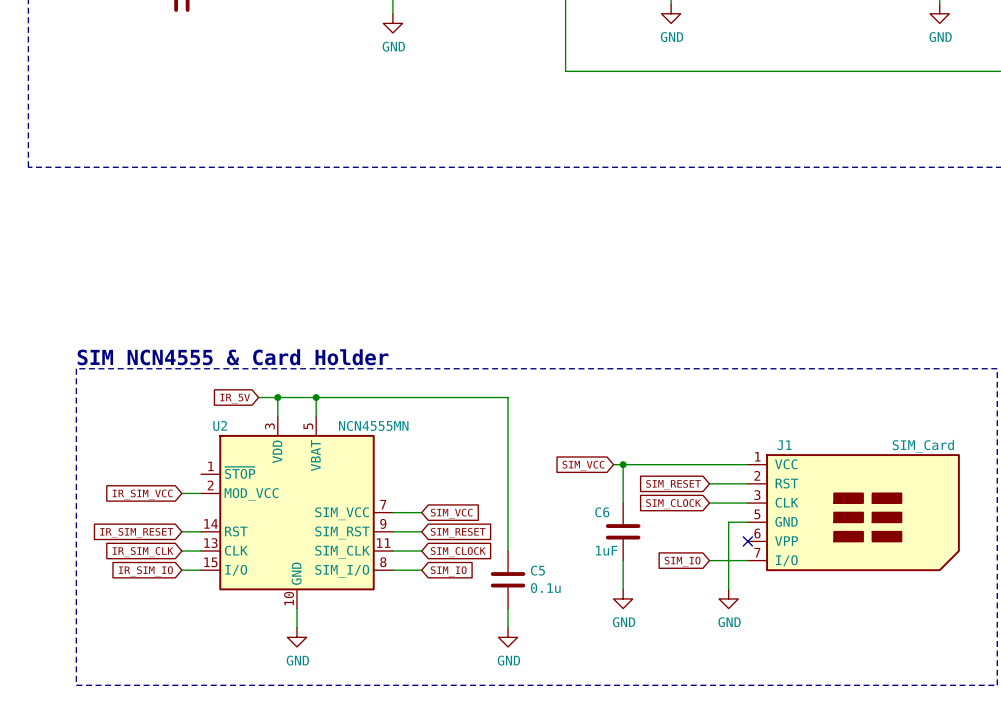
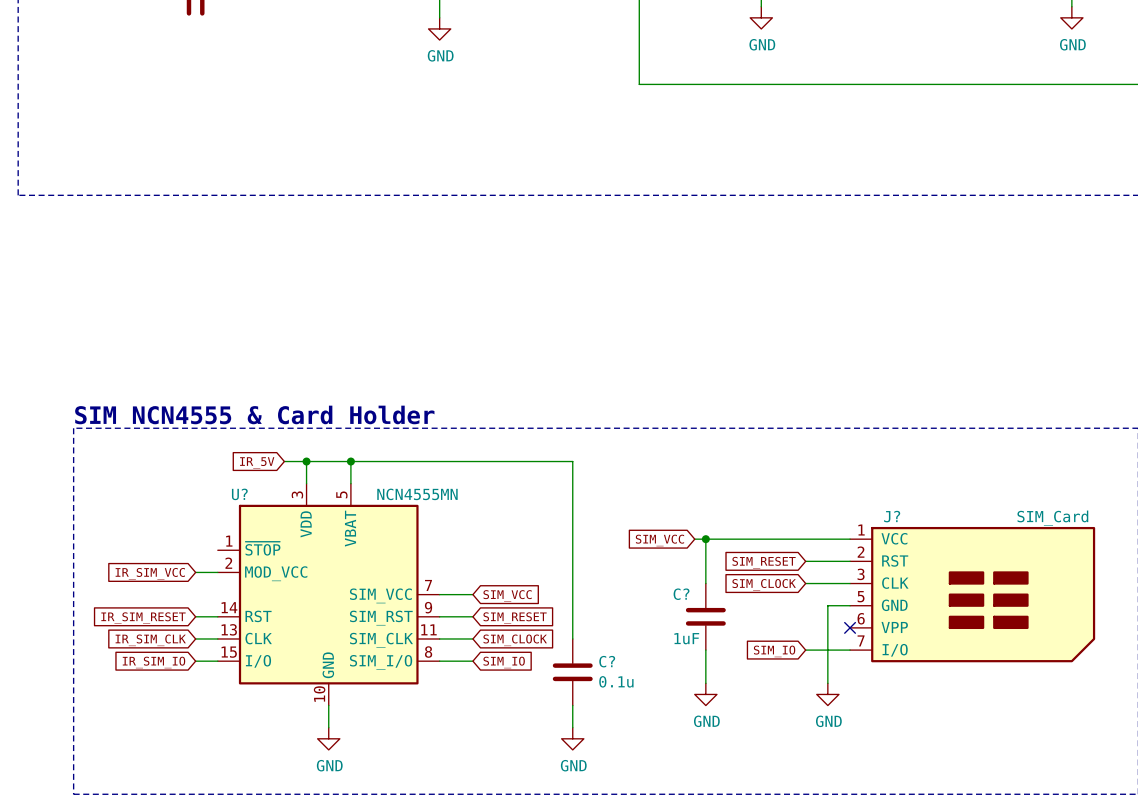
U2 name: U2 (220, 425) -> U? (239, 494)
J1 name: J1 (784, 445) -> J? (892, 516)
C6 name: C6 (602, 512) -> C? (681, 594)
C5 name: C5 (537, 570) -> C? (607, 661)

